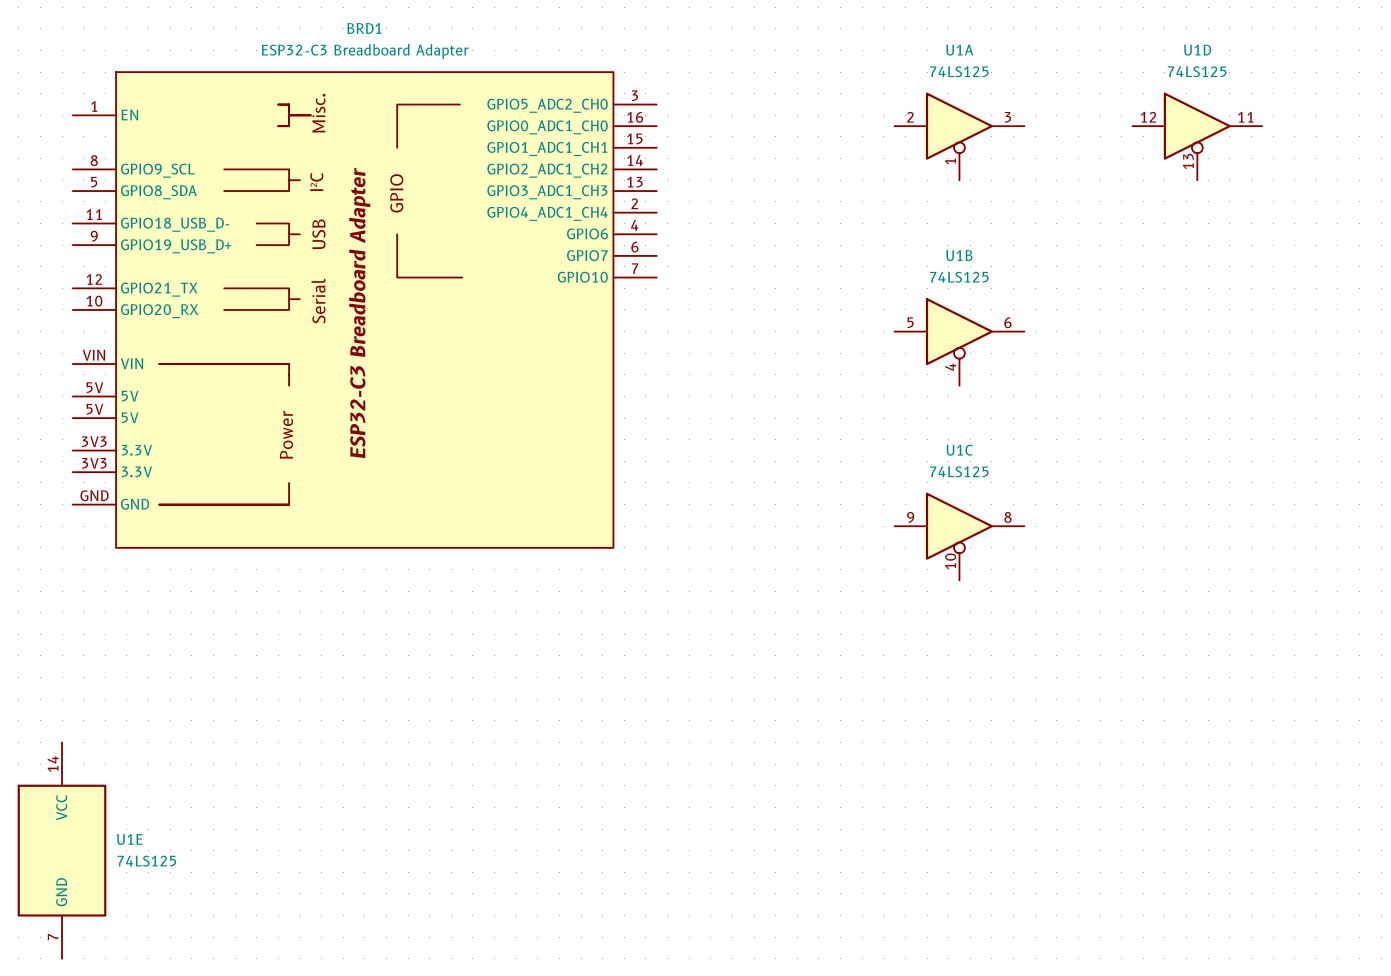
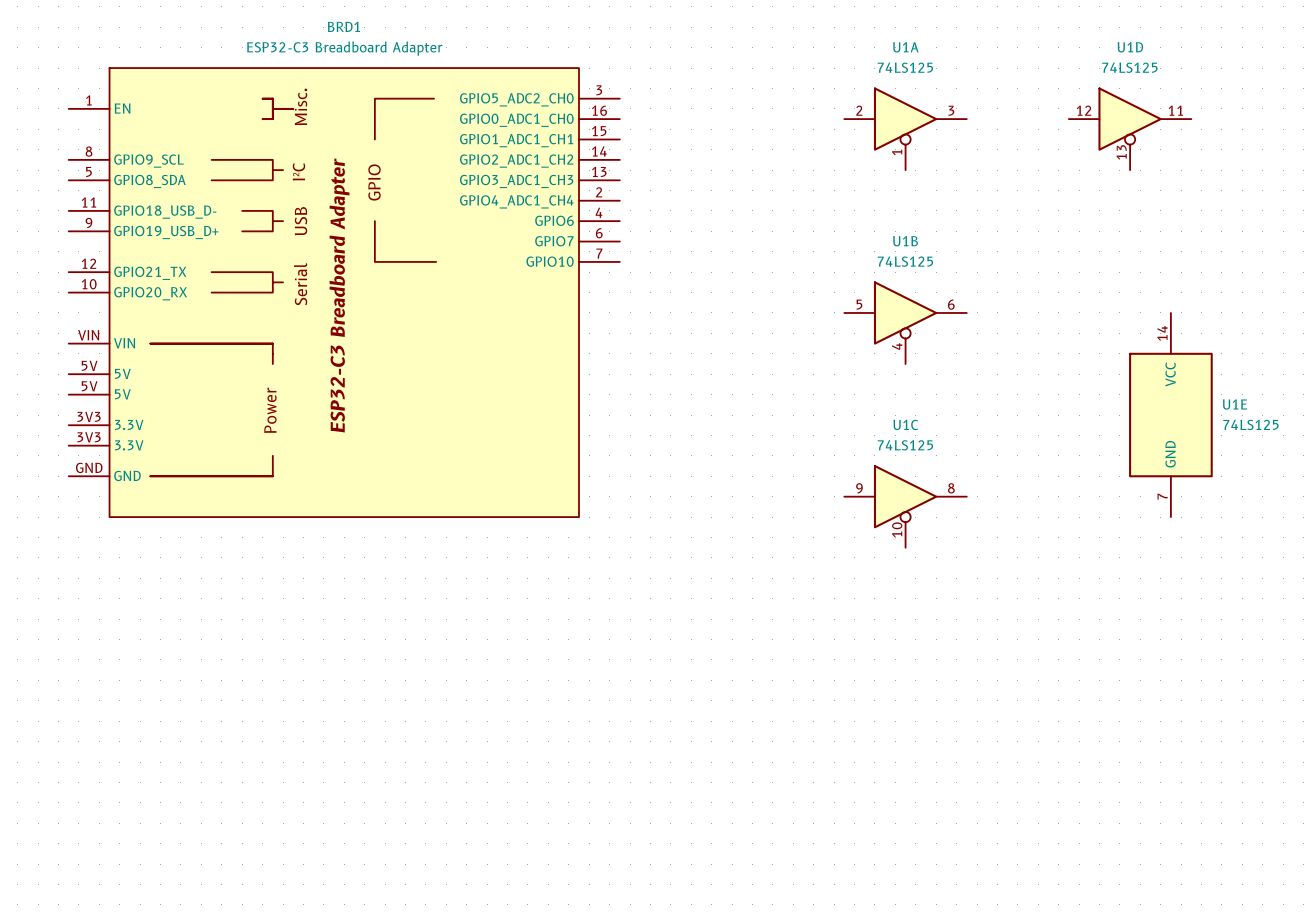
U1E position: (62, 850) -> (1170, 415)

